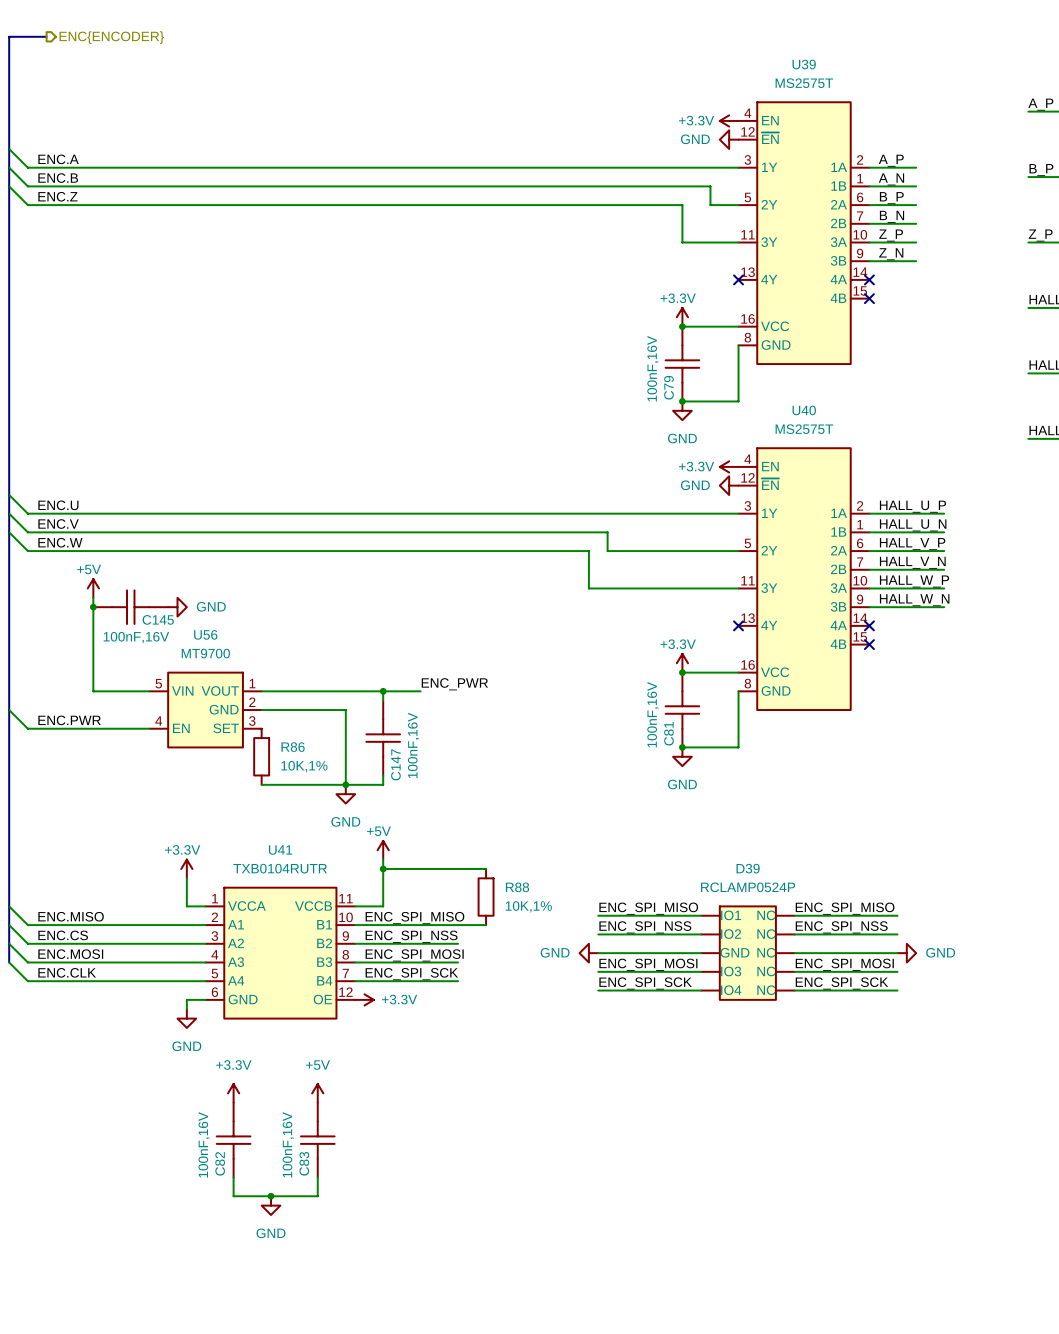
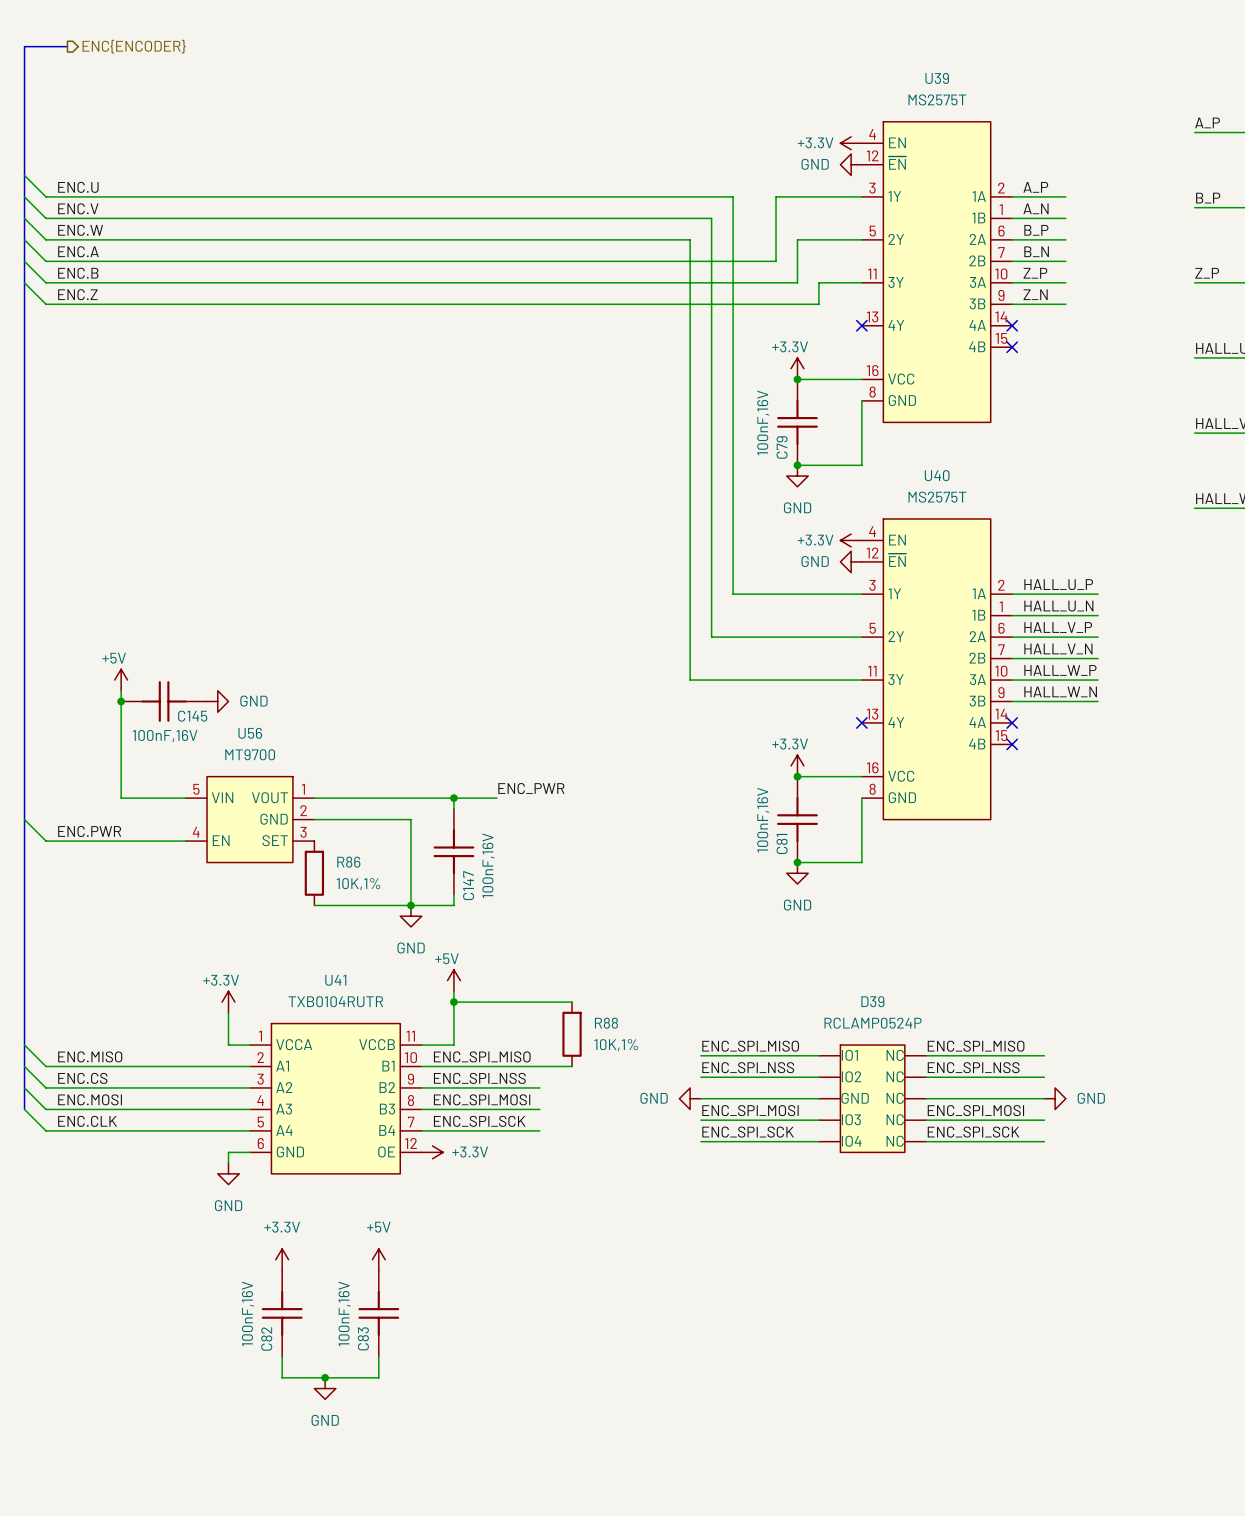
label: ENC.A (58, 159) -> ENC.U (78, 187)
wire: (626, 167) (663, 167) -> (733, 196) (733, 594)
wire: none -> (776, 196) (776, 261) (46, 261) (24, 239)
label: ENC.B (58, 178) -> ENC.V (78, 208)
wire: (607, 186) (710, 186) (710, 205) -> (797, 239) (829, 239)
label: ENC.Z (57, 196) -> ENC.W (80, 230)
wire: (588, 205) (682, 205) -> (690, 239) (690, 637)
label: none -> ENC.A (78, 251)
wire: none -> (24, 261) (46, 282) (797, 282)
label: none -> ENC.B (78, 273)
wire: (682, 242) (701, 242) -> (24, 282) (46, 304) (818, 304) (818, 282)
label: none -> ENC.Z (77, 294)
wire: (9, 494) (27, 513) (626, 513) -> none
label: ENC.U (58, 505) -> none
wire: (9, 513) (27, 532) (607, 532) -> (711, 218) (711, 615)
label: ENC.V (58, 524) -> none
wire: (9, 532) (27, 551) (588, 551) -> none
label: ENC.W (60, 542) -> none

